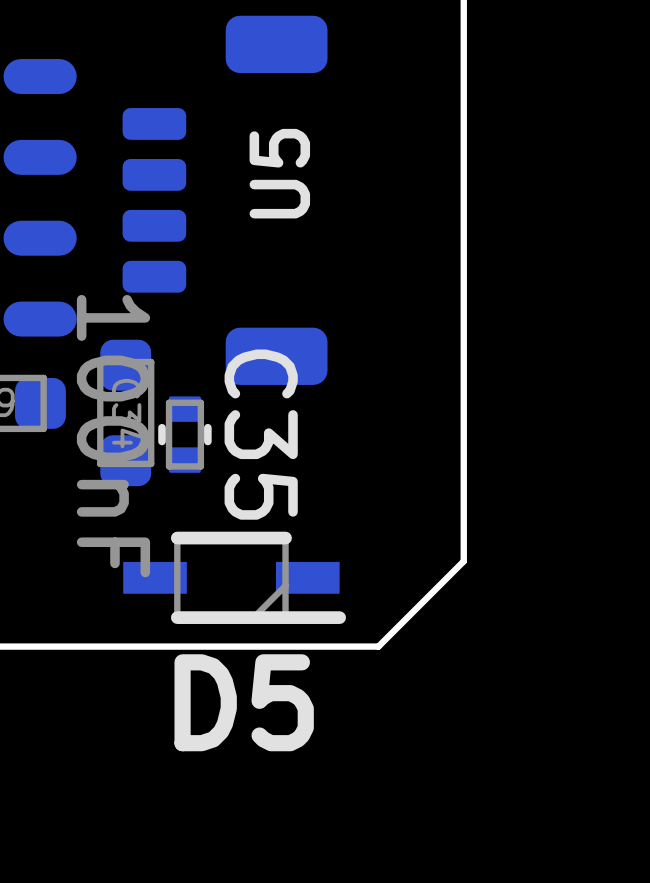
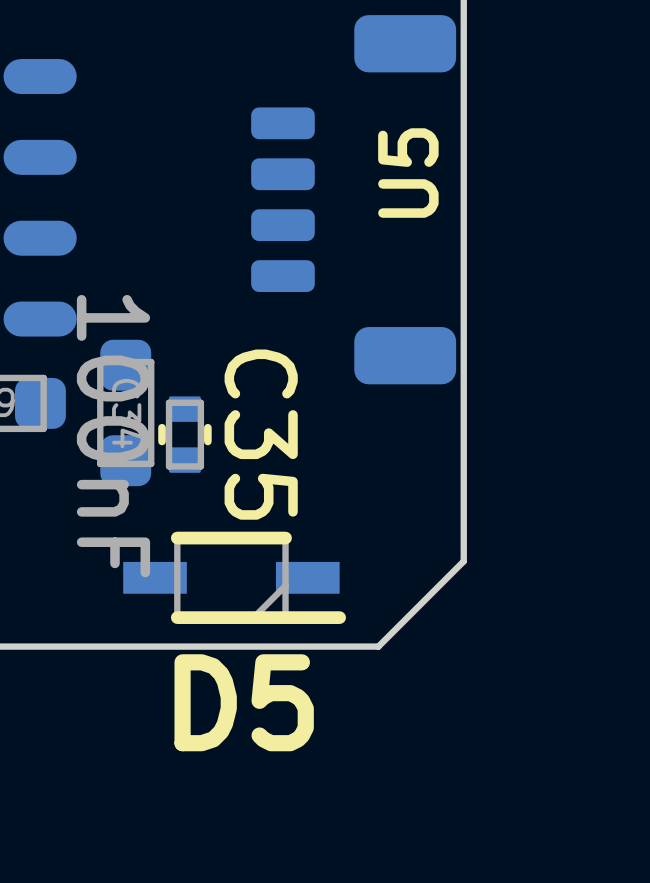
U5 position: (225, 200) -> (353, 199)

